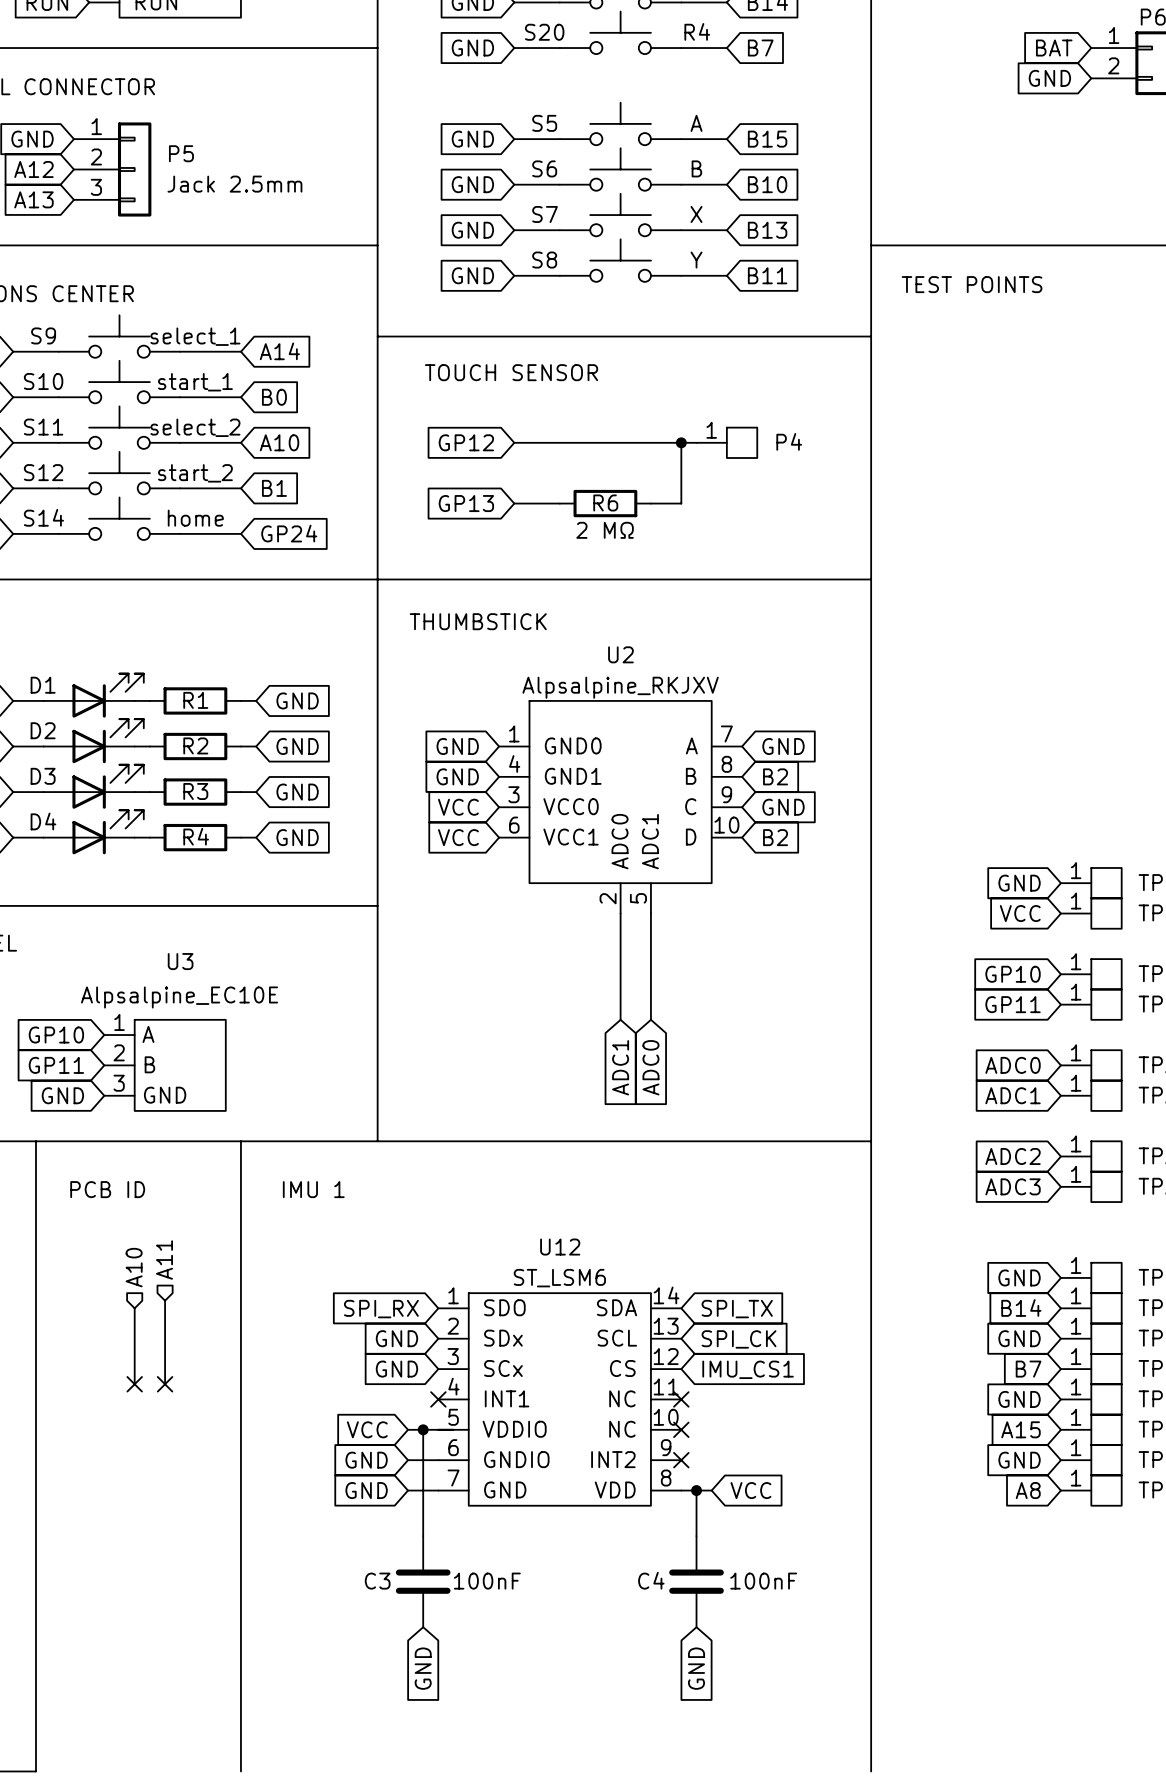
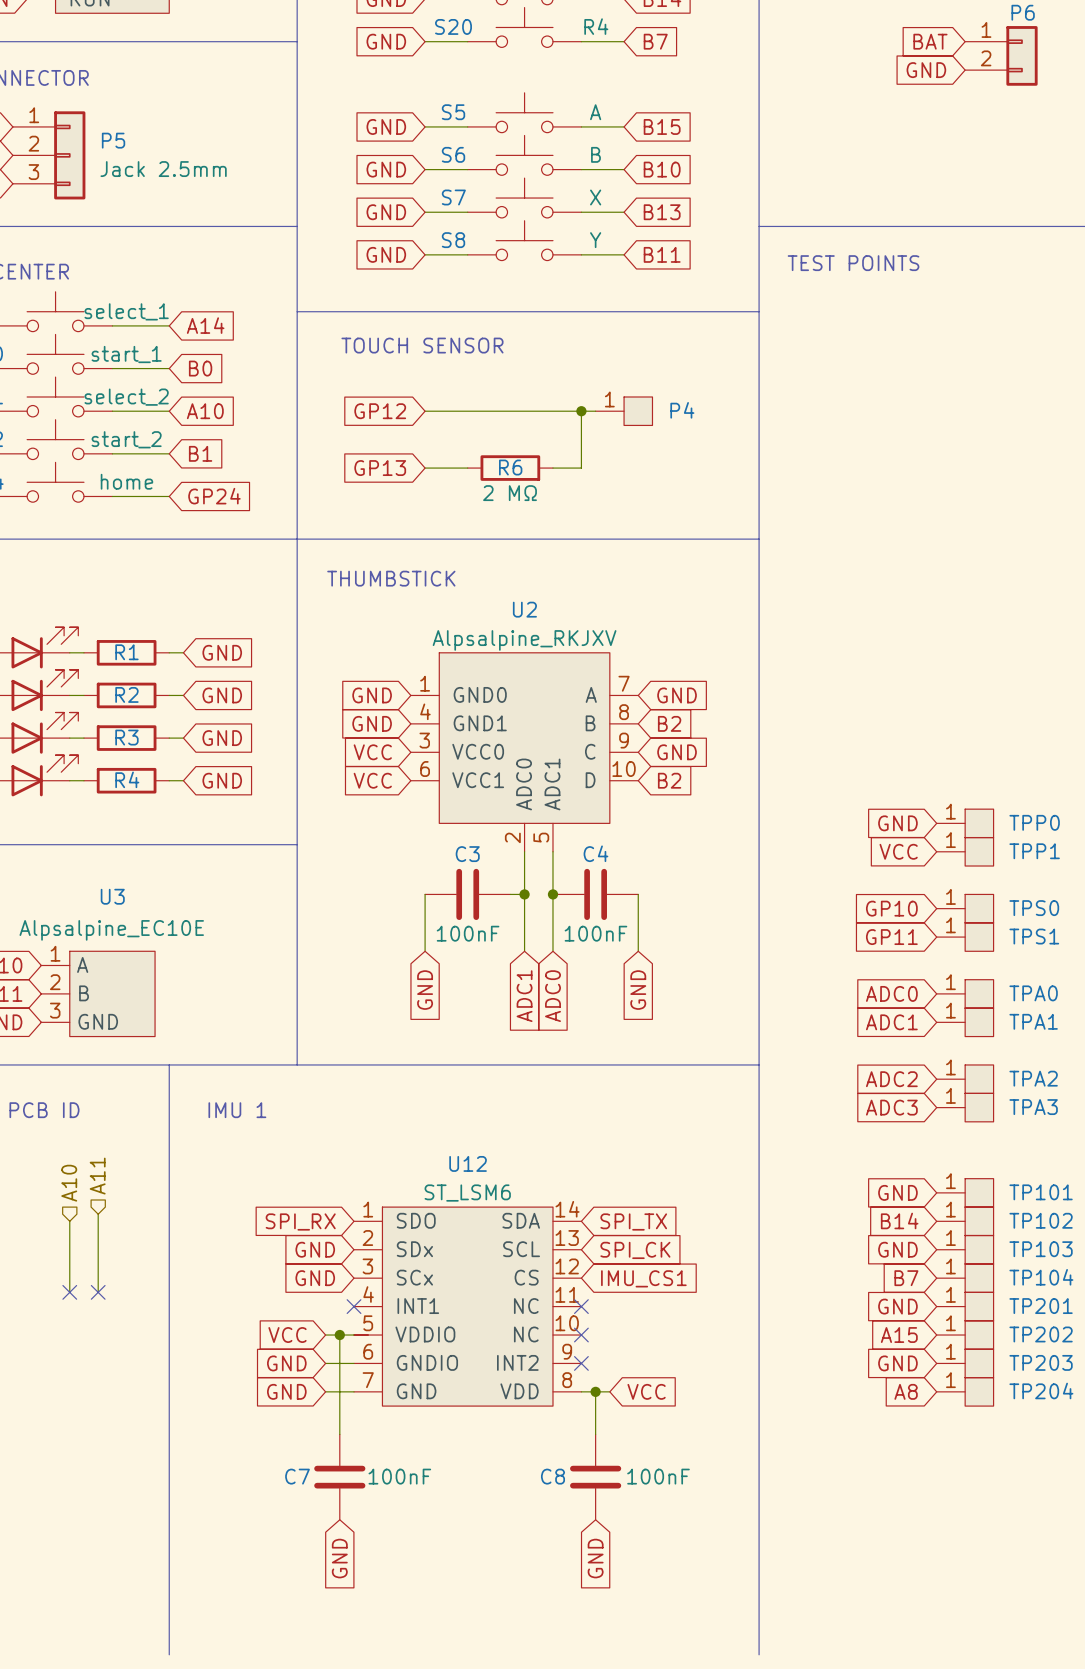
wire: none -> (425, 894) (425, 951)
C3: none -> 100nF (467, 894)
wire: none -> (510, 894) (524, 894)
junction: none -> (524, 894)
junction: none -> (552, 894)
C4: none -> 100nF (595, 894)
wire: none -> (638, 894) (638, 951)
global label: none -> GND (425, 990)
global label: none -> GND (638, 990)
C4 name: C4 (651, 1580) -> C8 (552, 1476)
C3 name: C3 (377, 1581) -> C7 (297, 1476)

